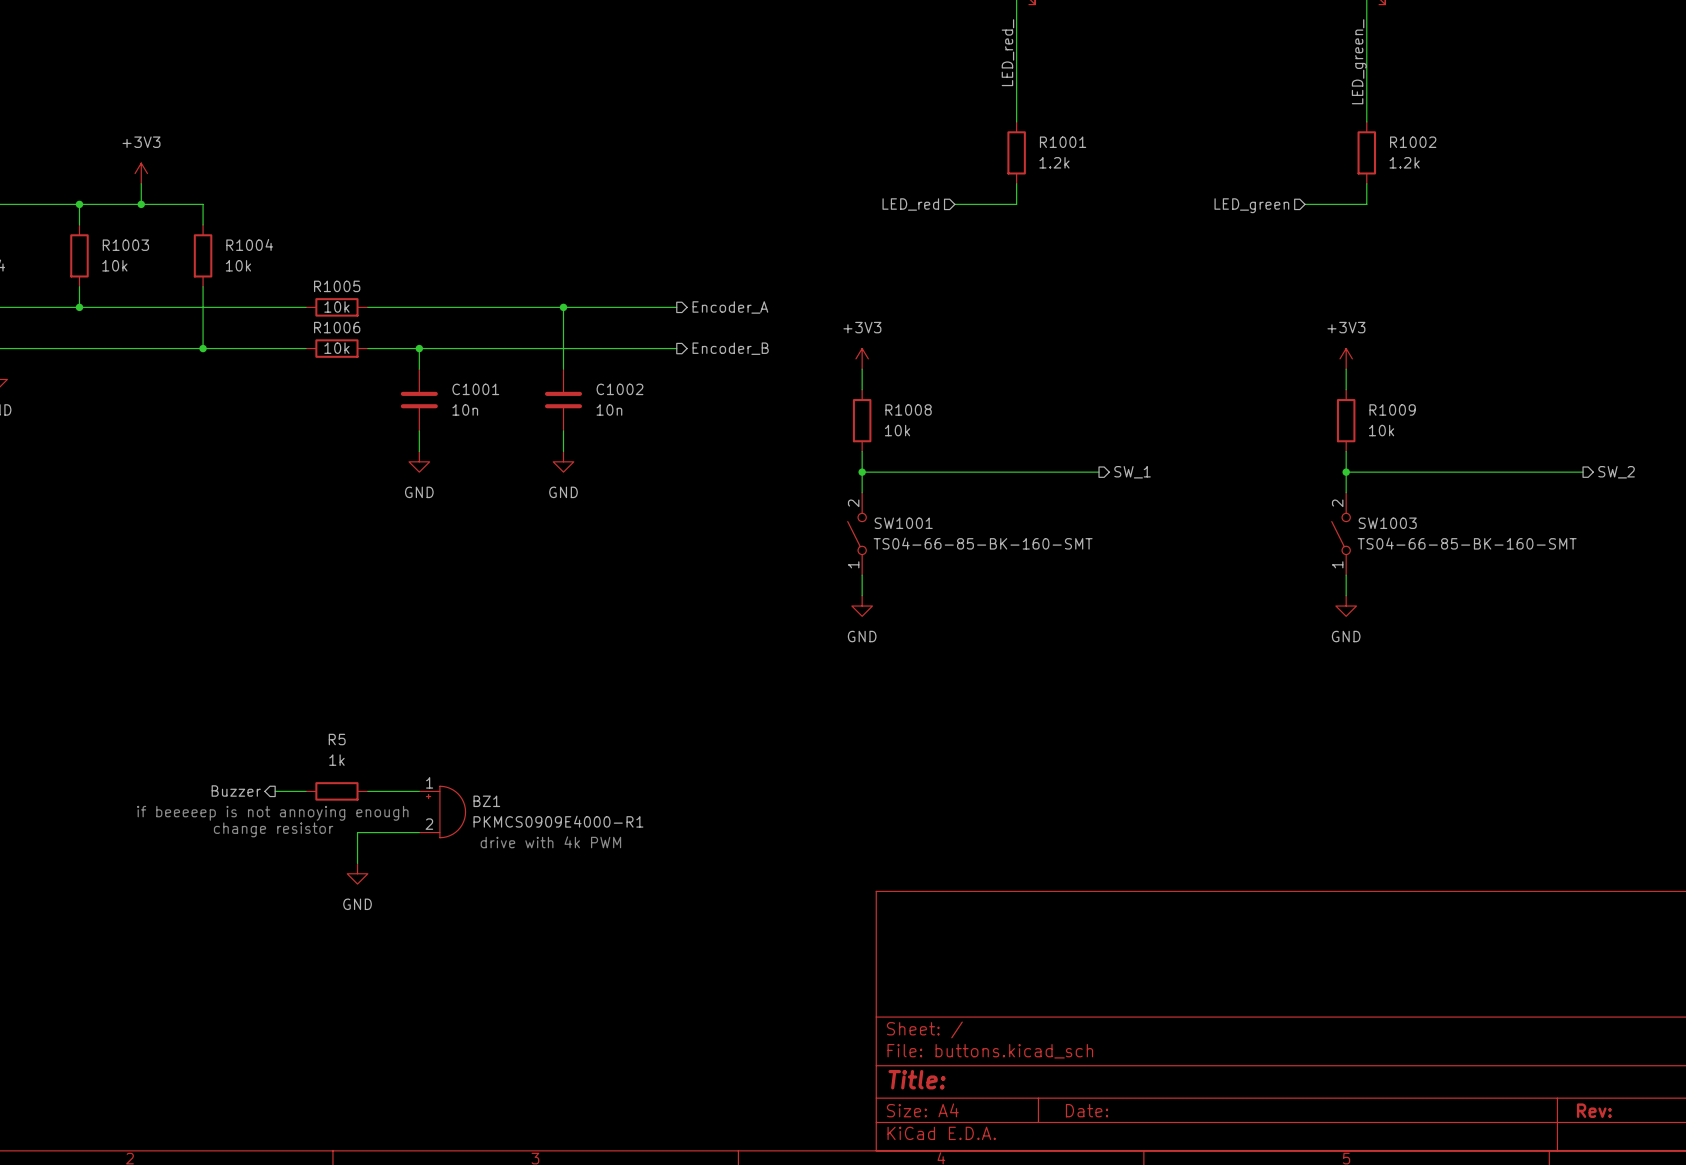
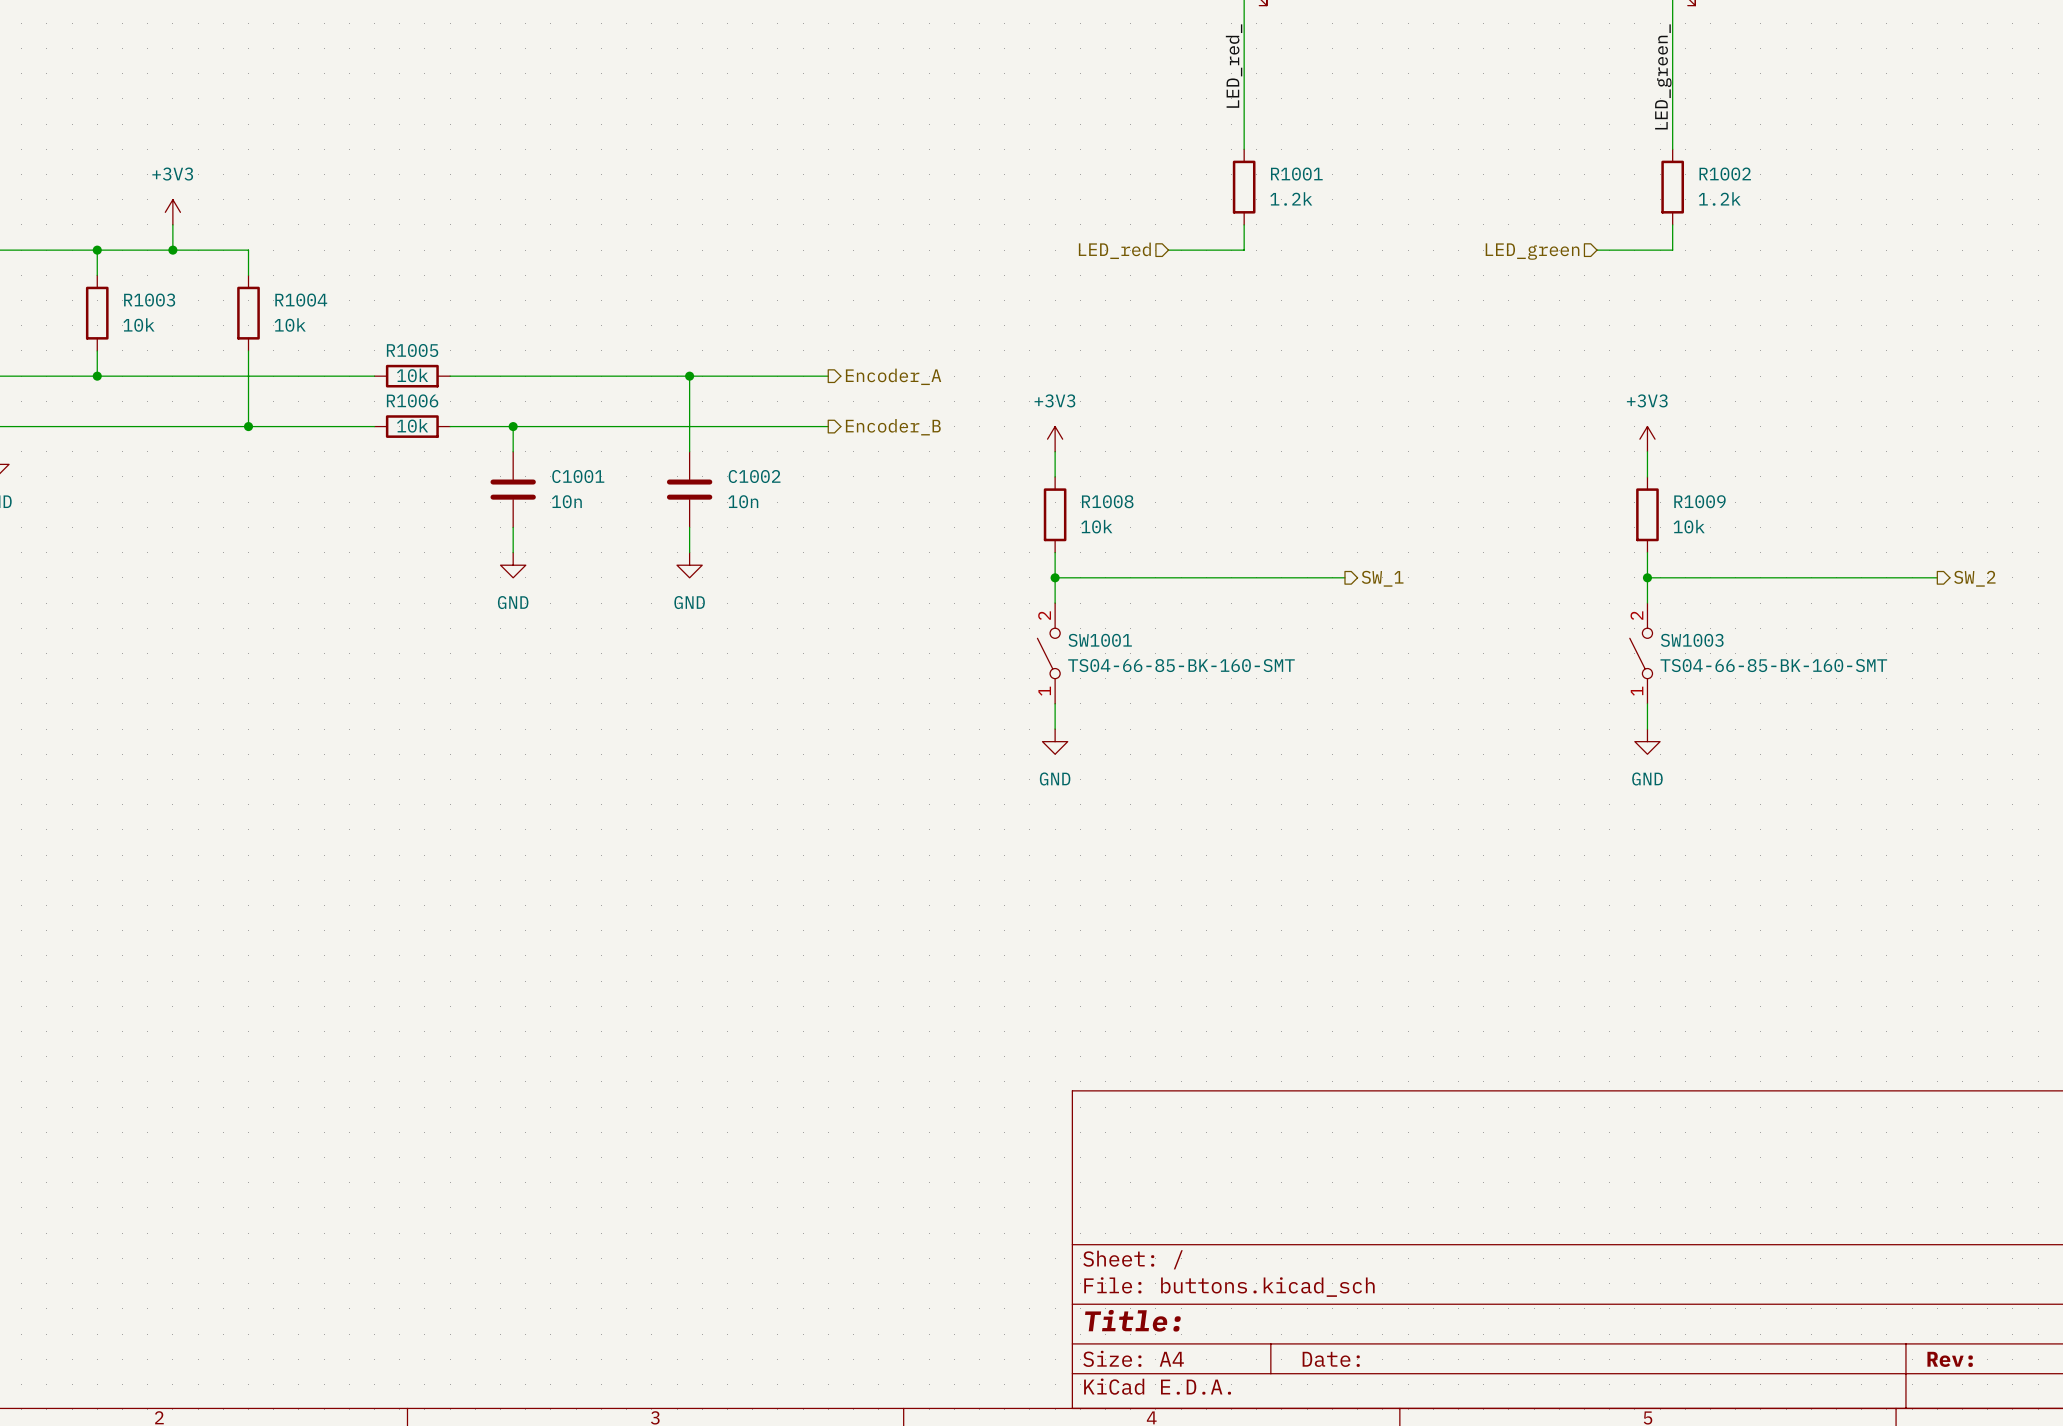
hierarchical label: Buzzer (236, 791) -> none
wire: (275, 791) (306, 791) -> none
R5: 1k (336, 791) -> none
wire: (367, 791) (419, 791) -> none
BZ1: PKMCS0909E4000-R1 (442, 811) -> none
text: if beeeeep is not annoying enough (272, 813) -> none
text: change resistor (273, 829) -> none
wire: (419, 832) (357, 832) (357, 863) -> none
text: drive with 4k PWM (550, 842) -> none
power symbol: GND (357, 873) -> none

